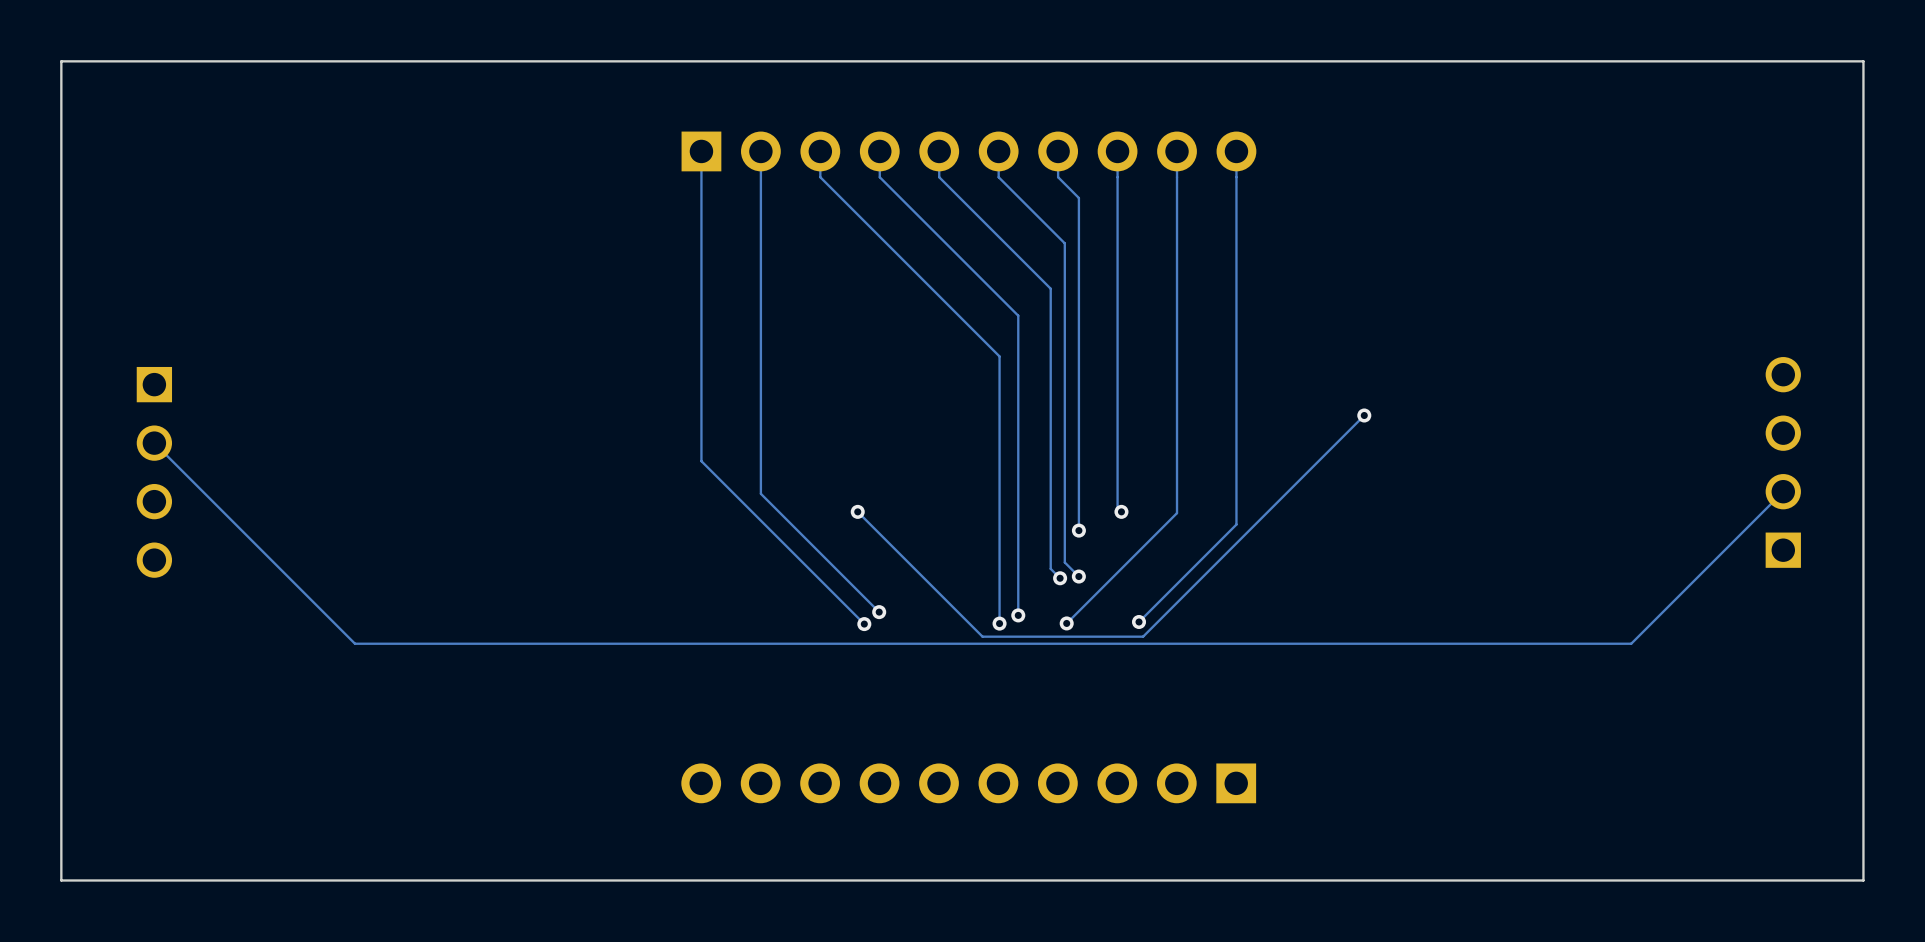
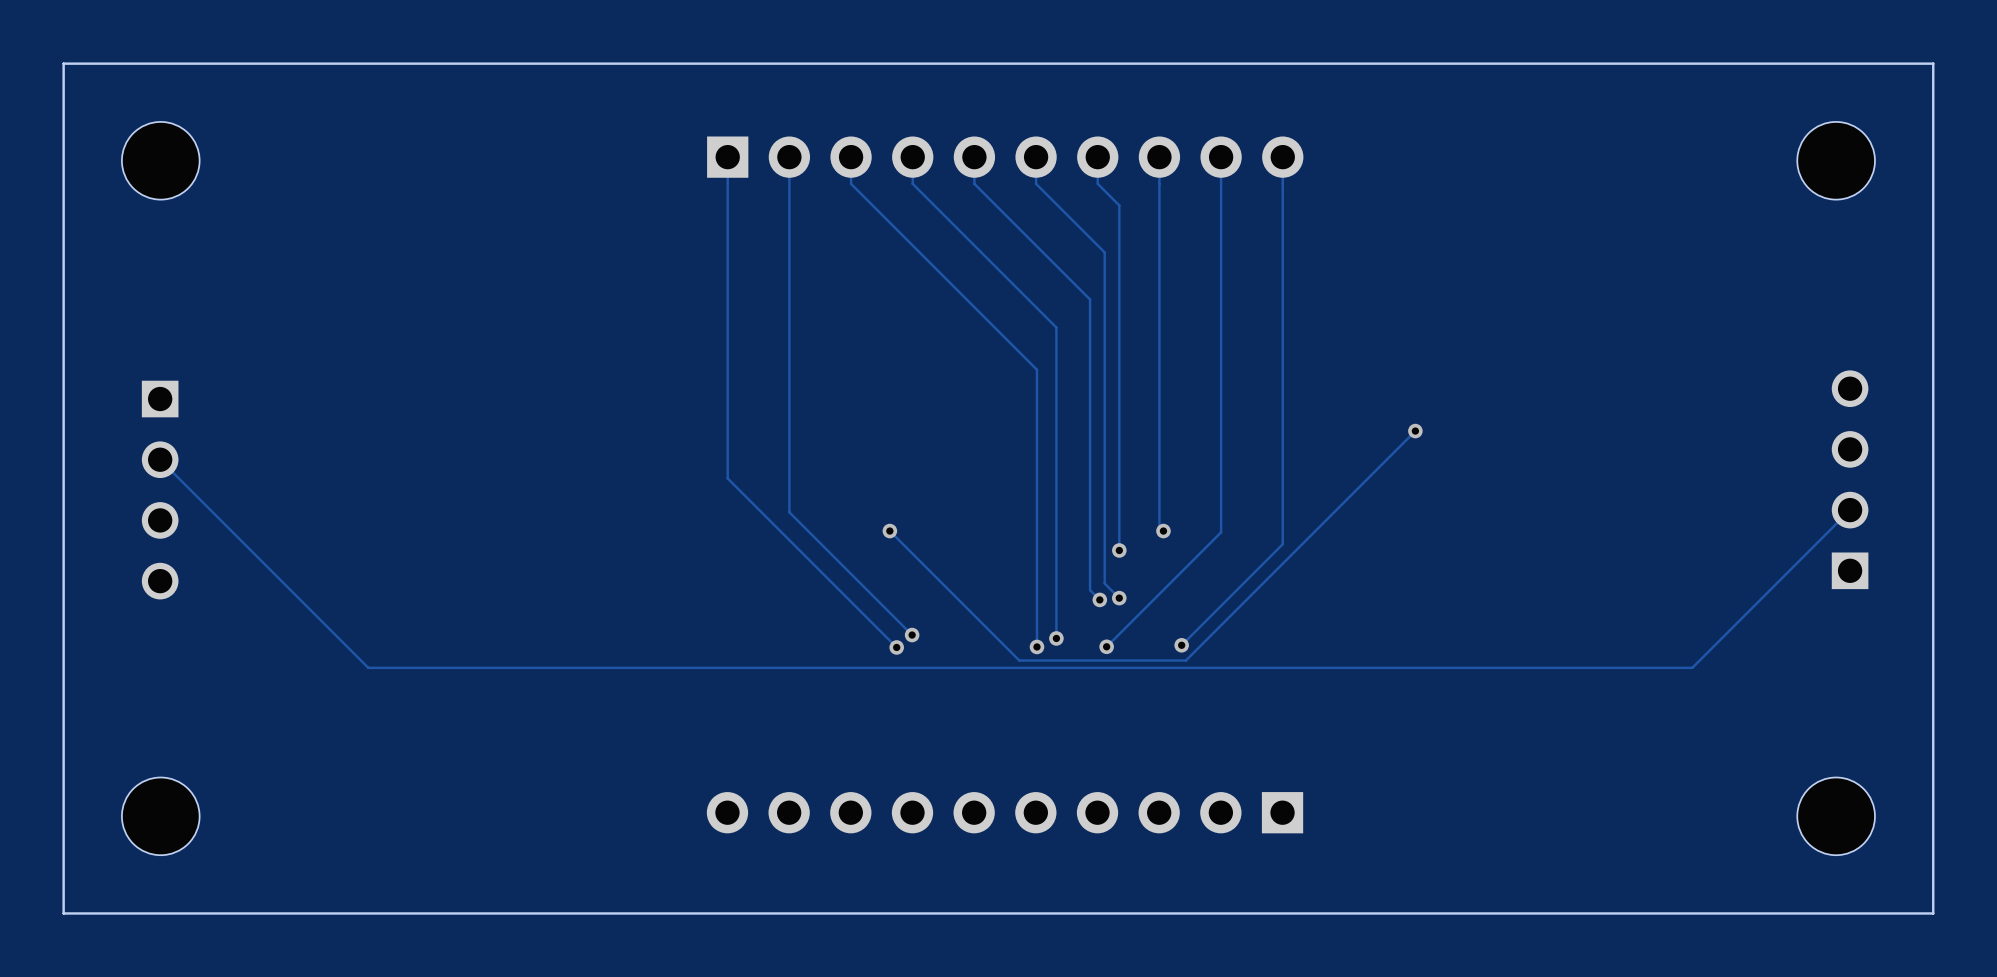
part: none -> (160, 160)
part: none -> (1836, 160)
part: none -> (160, 816)
part: none -> (1836, 816)

